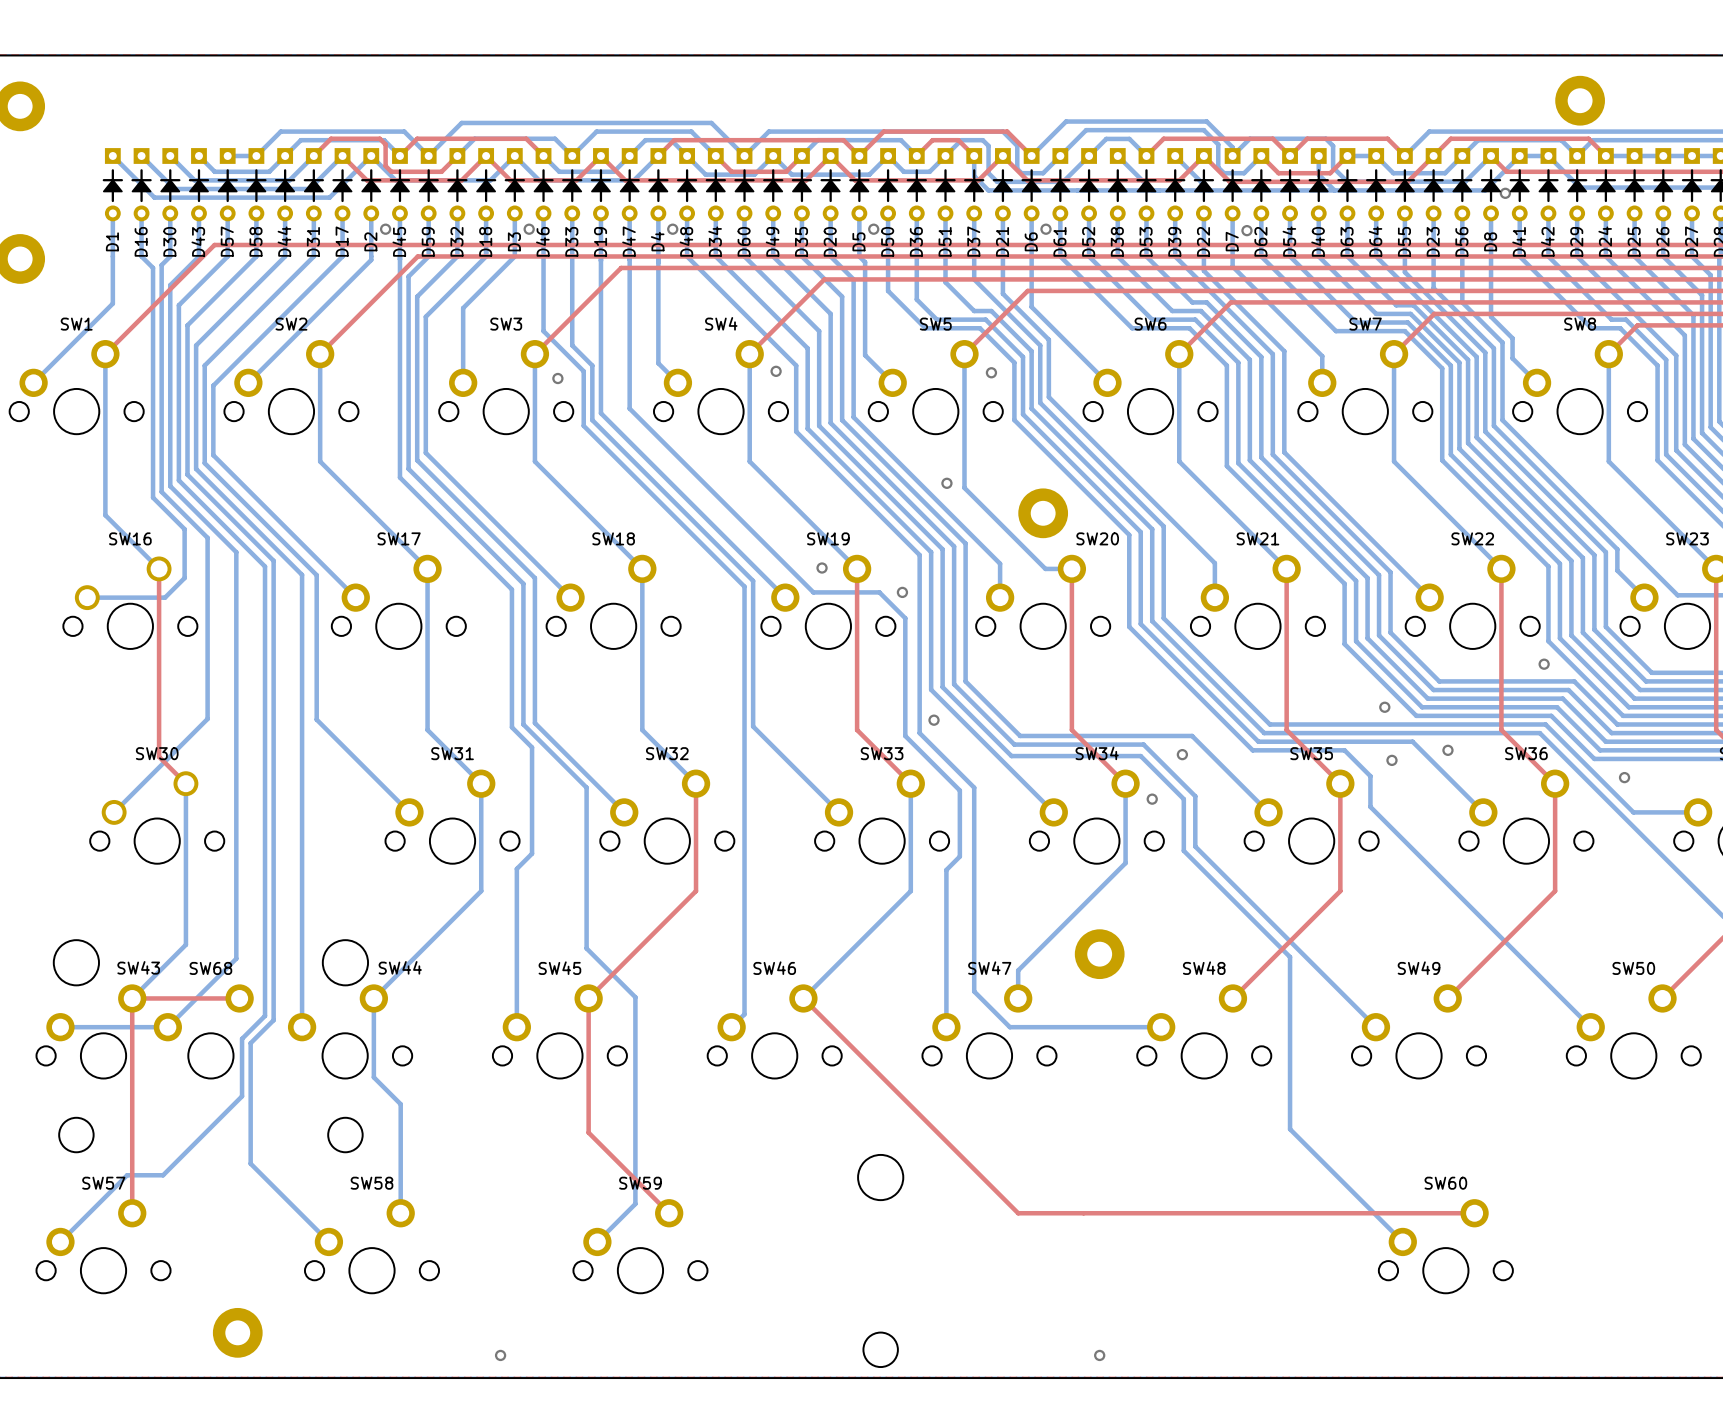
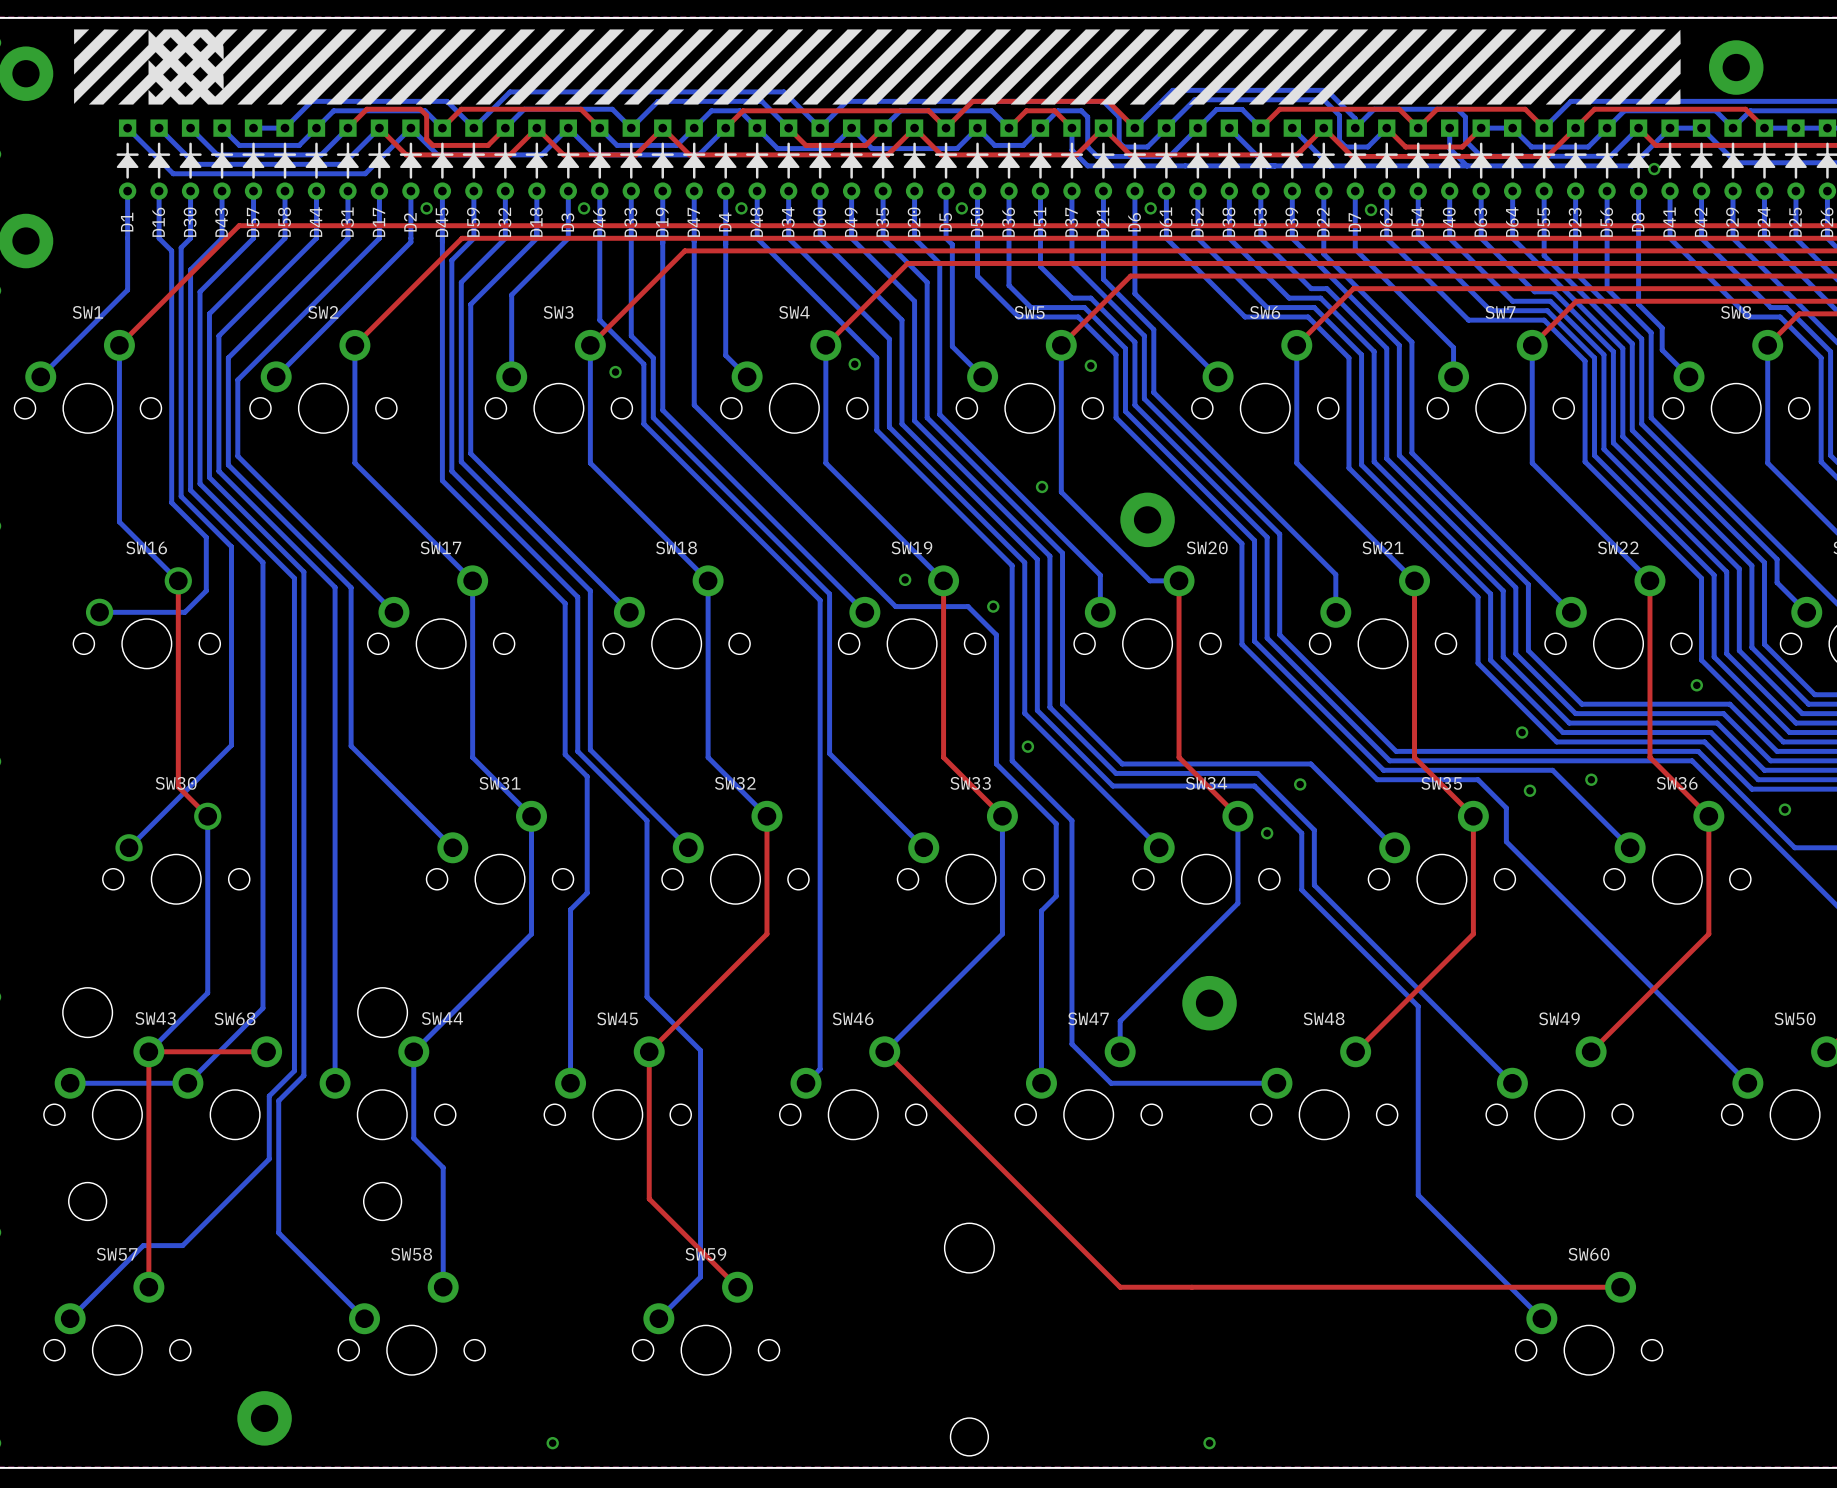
drawing: none -> [74, 29, 1681, 105]

